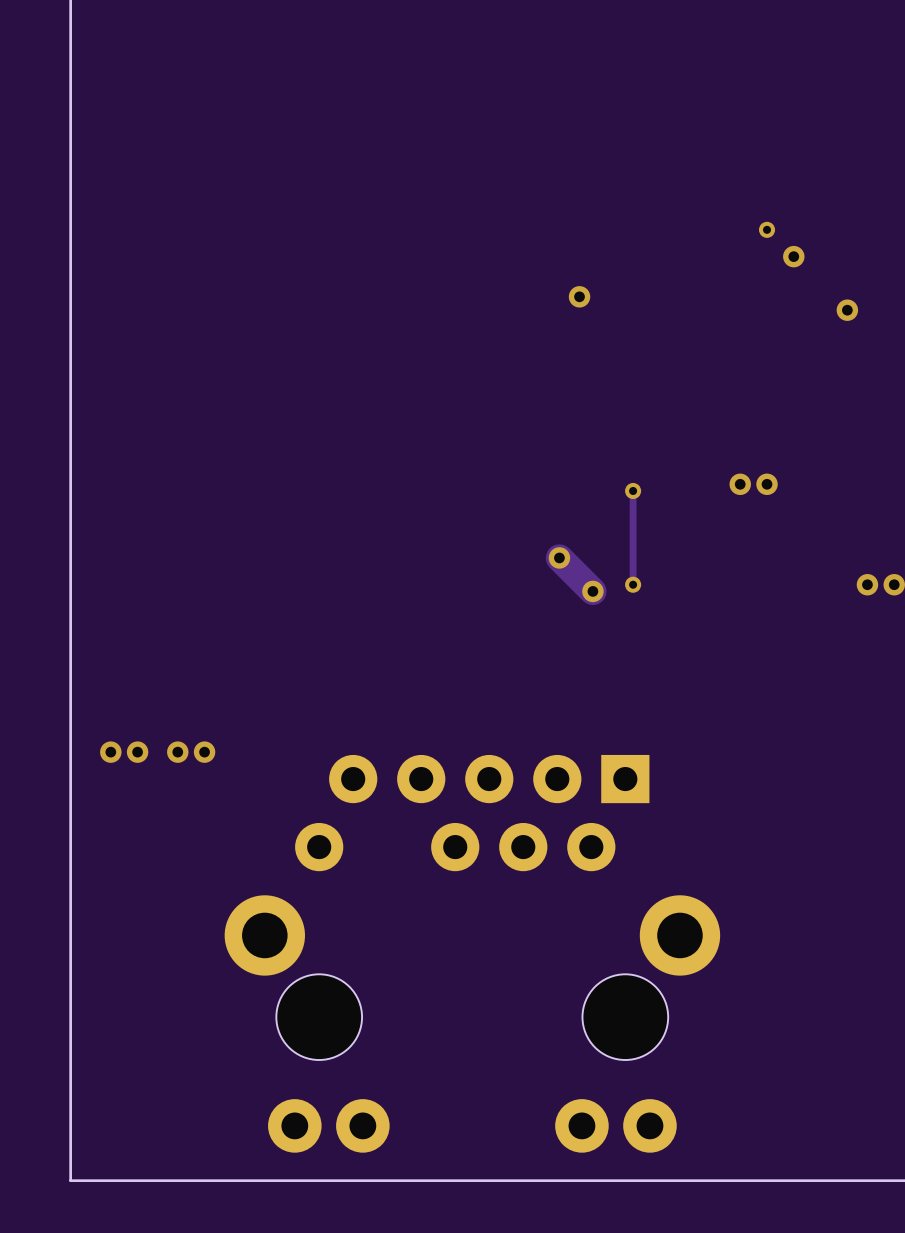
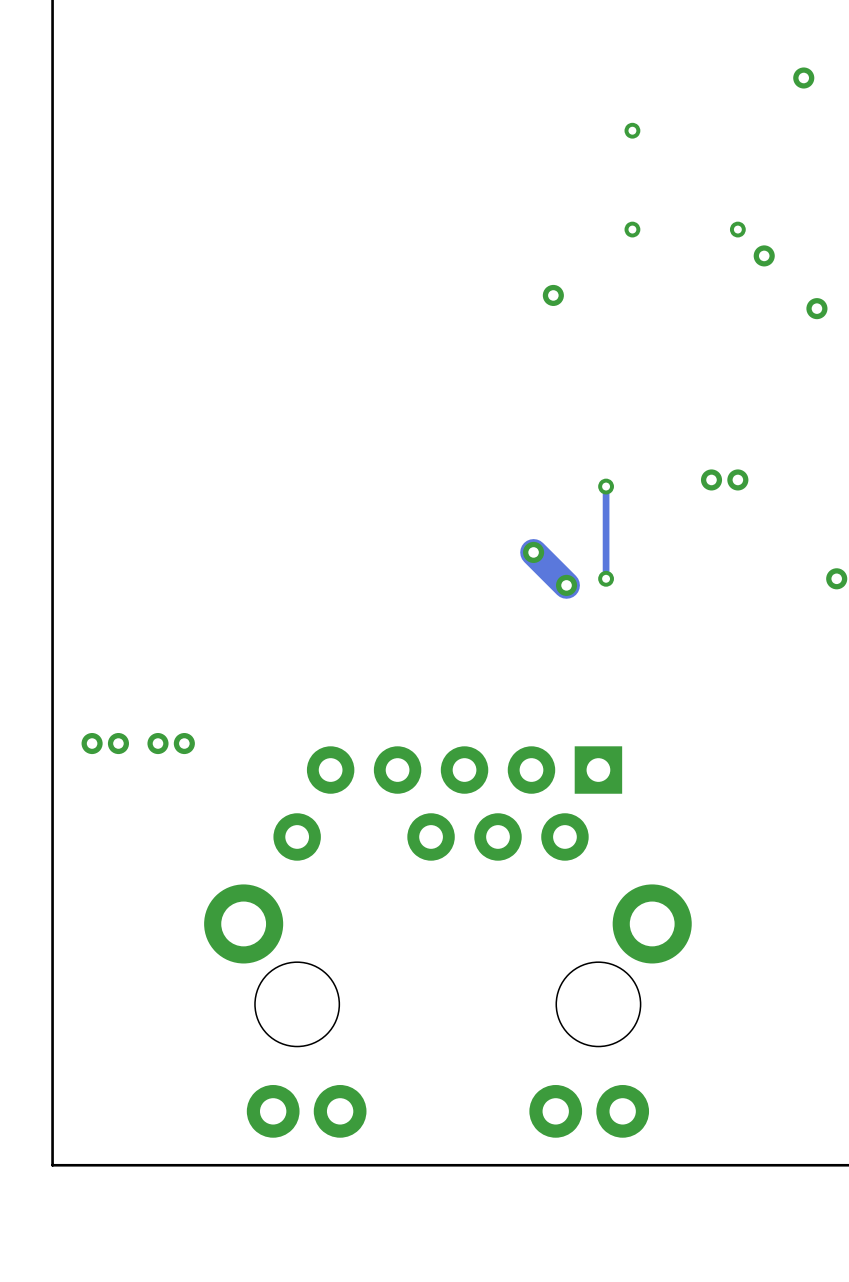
via: none -> (803, 77)
via: none -> (632, 130)
via: none -> (632, 229)

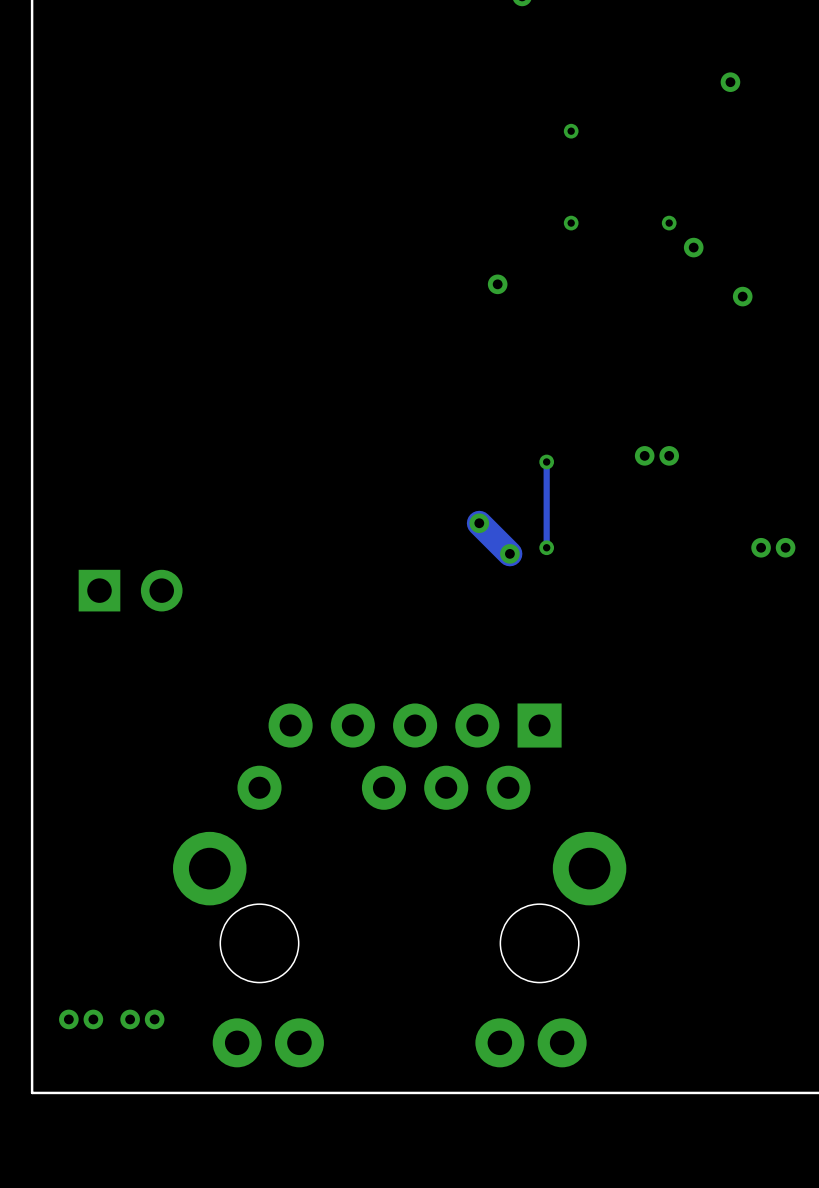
part: none -> (130, 590)
via: (92, 743) -> none
via: (118, 743) -> none
via: (157, 743) -> none
via: (184, 743) -> none
via: none -> (68, 1019)
via: none -> (93, 1019)
via: none -> (130, 1019)
via: none -> (154, 1019)

